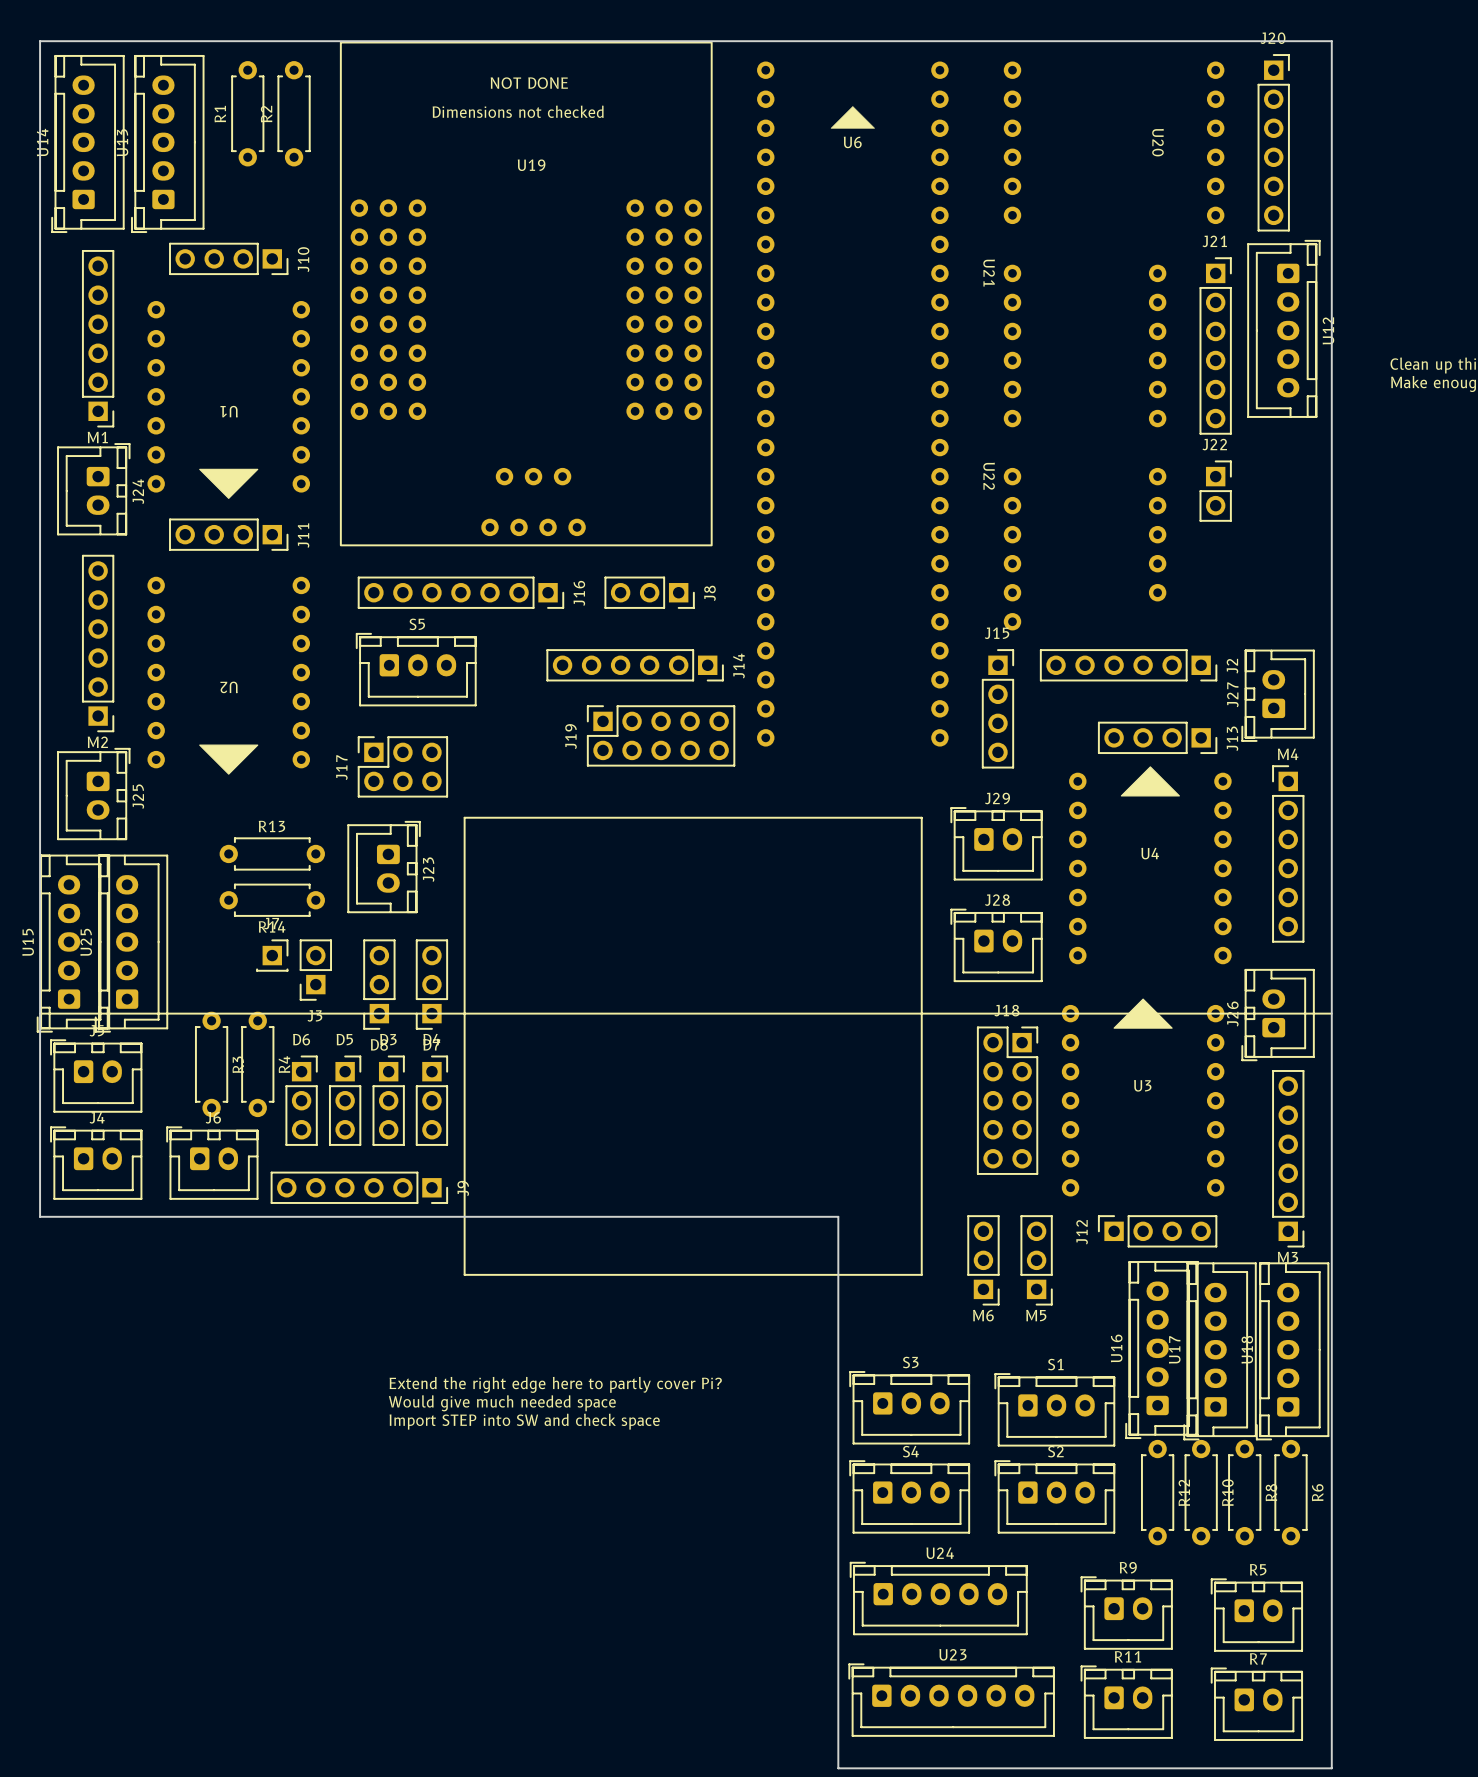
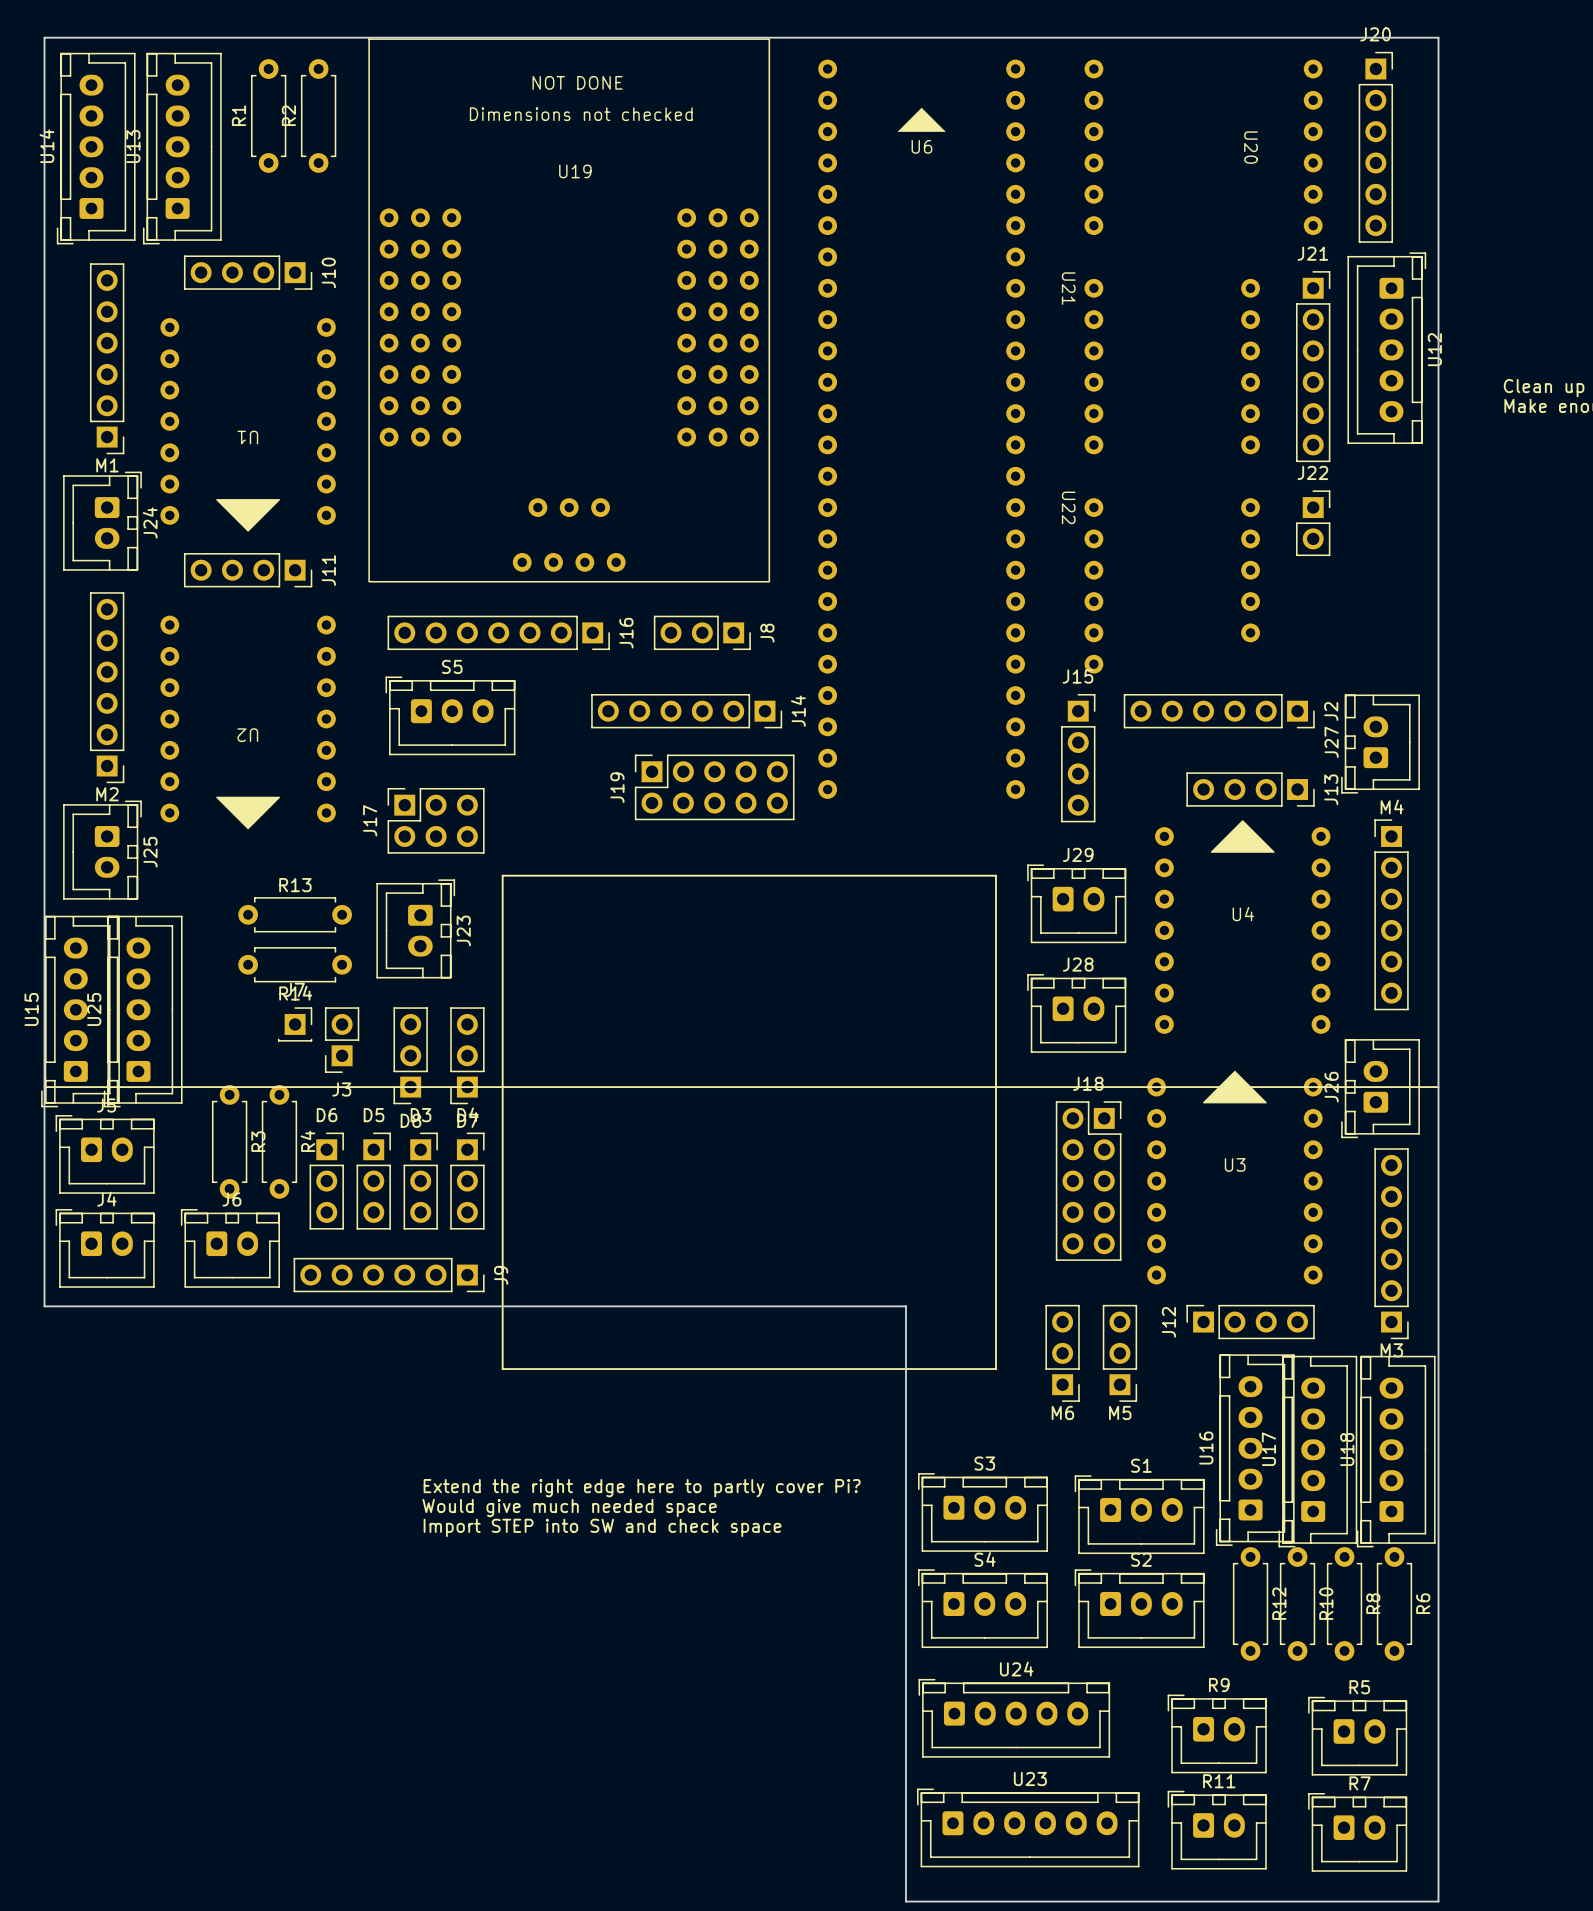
U19 footprint: [340, 41, 713, 546] -> [368, 38, 770, 583]

